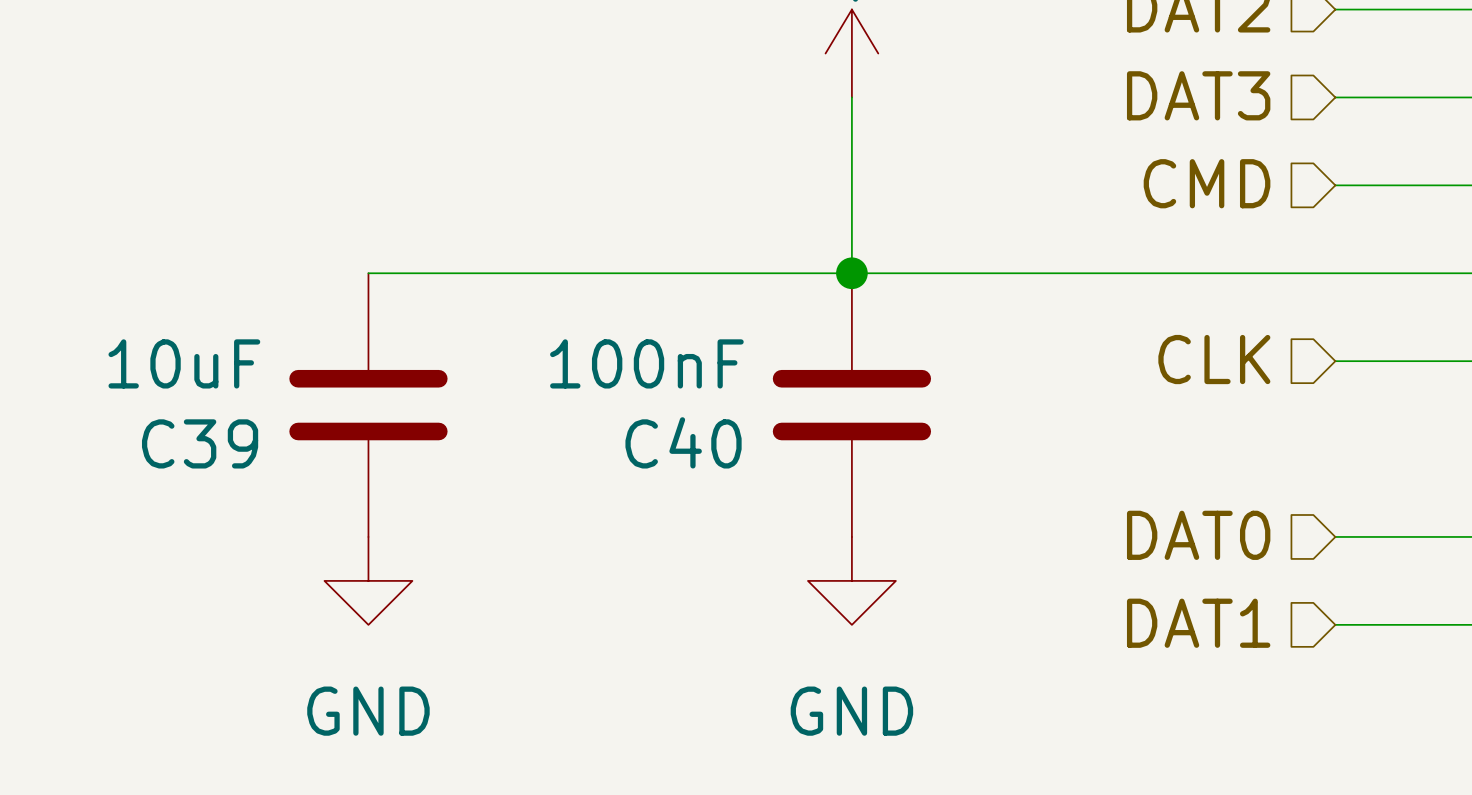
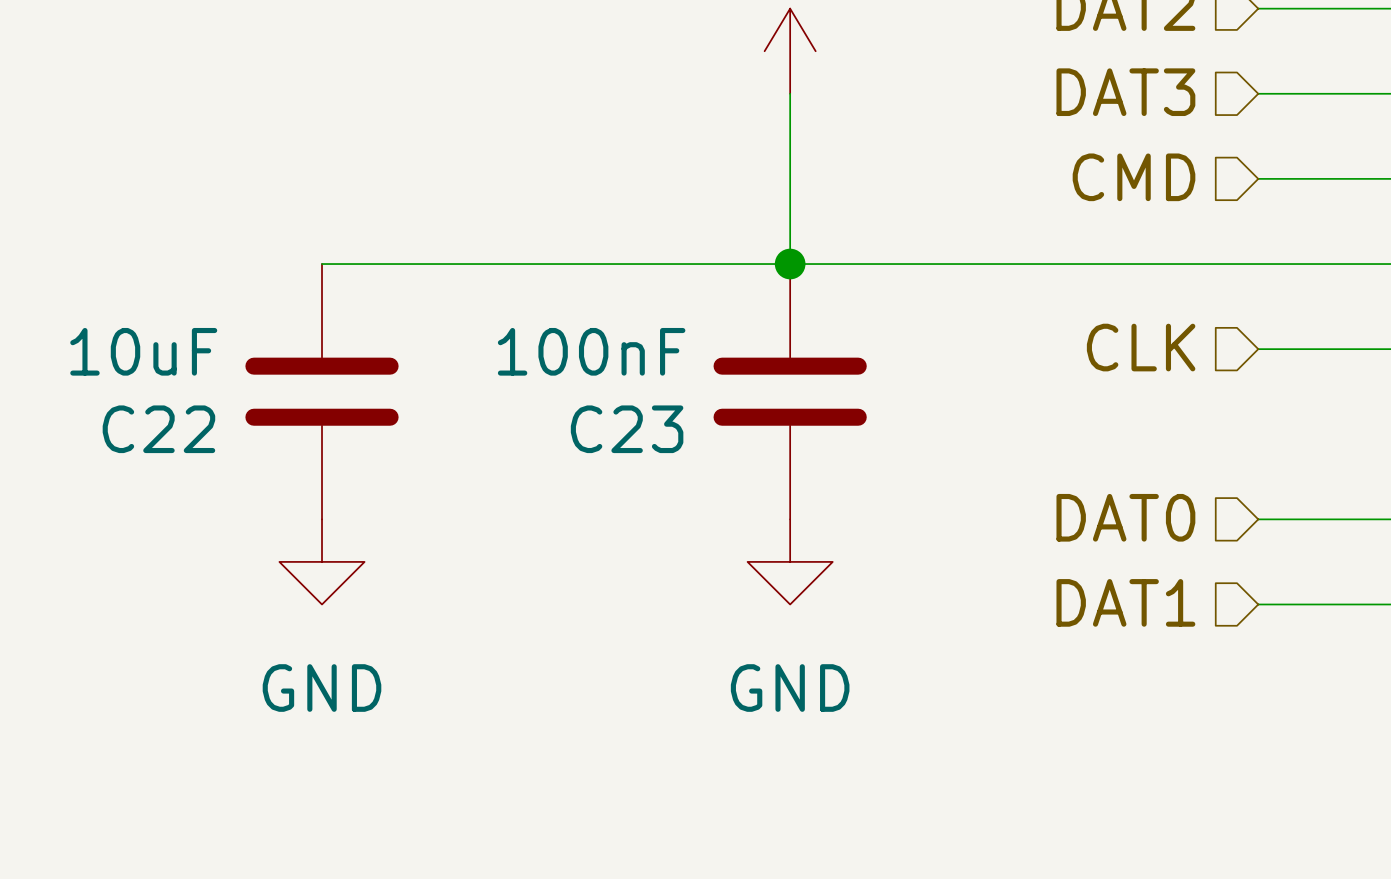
C40 name: C40 (683, 442) -> C23 (627, 429)
C39 name: C39 (200, 443) -> C22 (158, 429)

